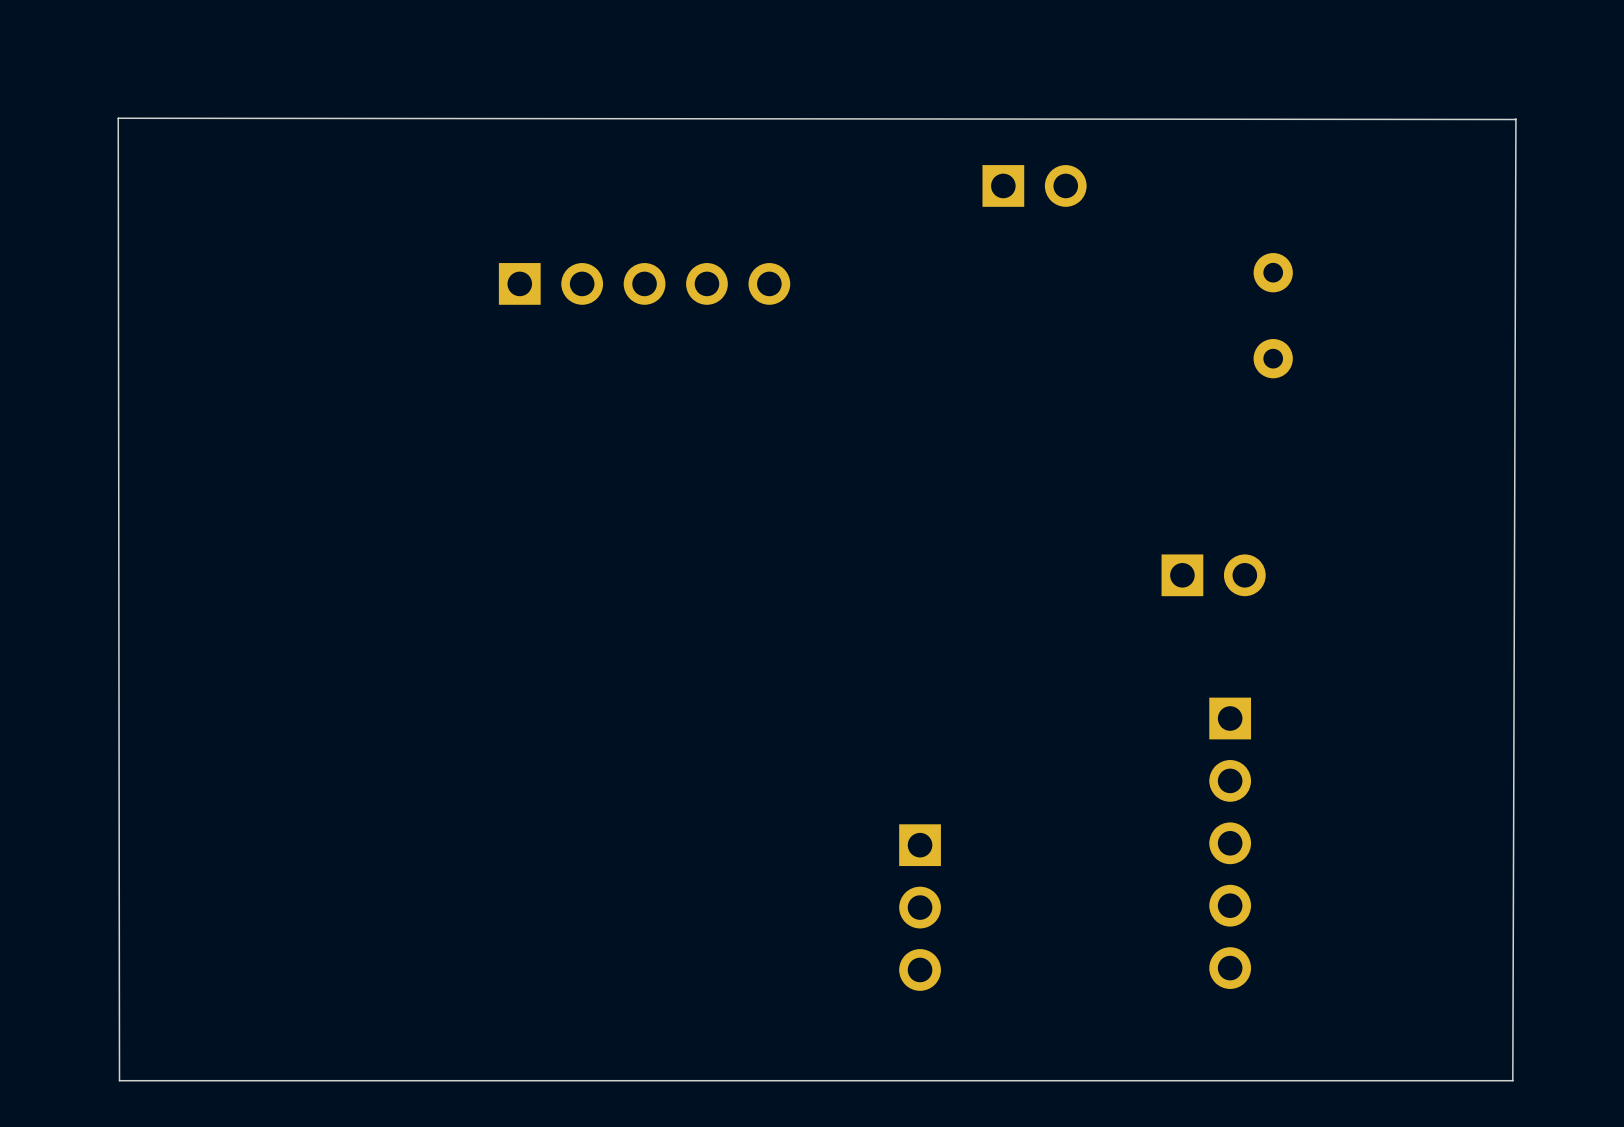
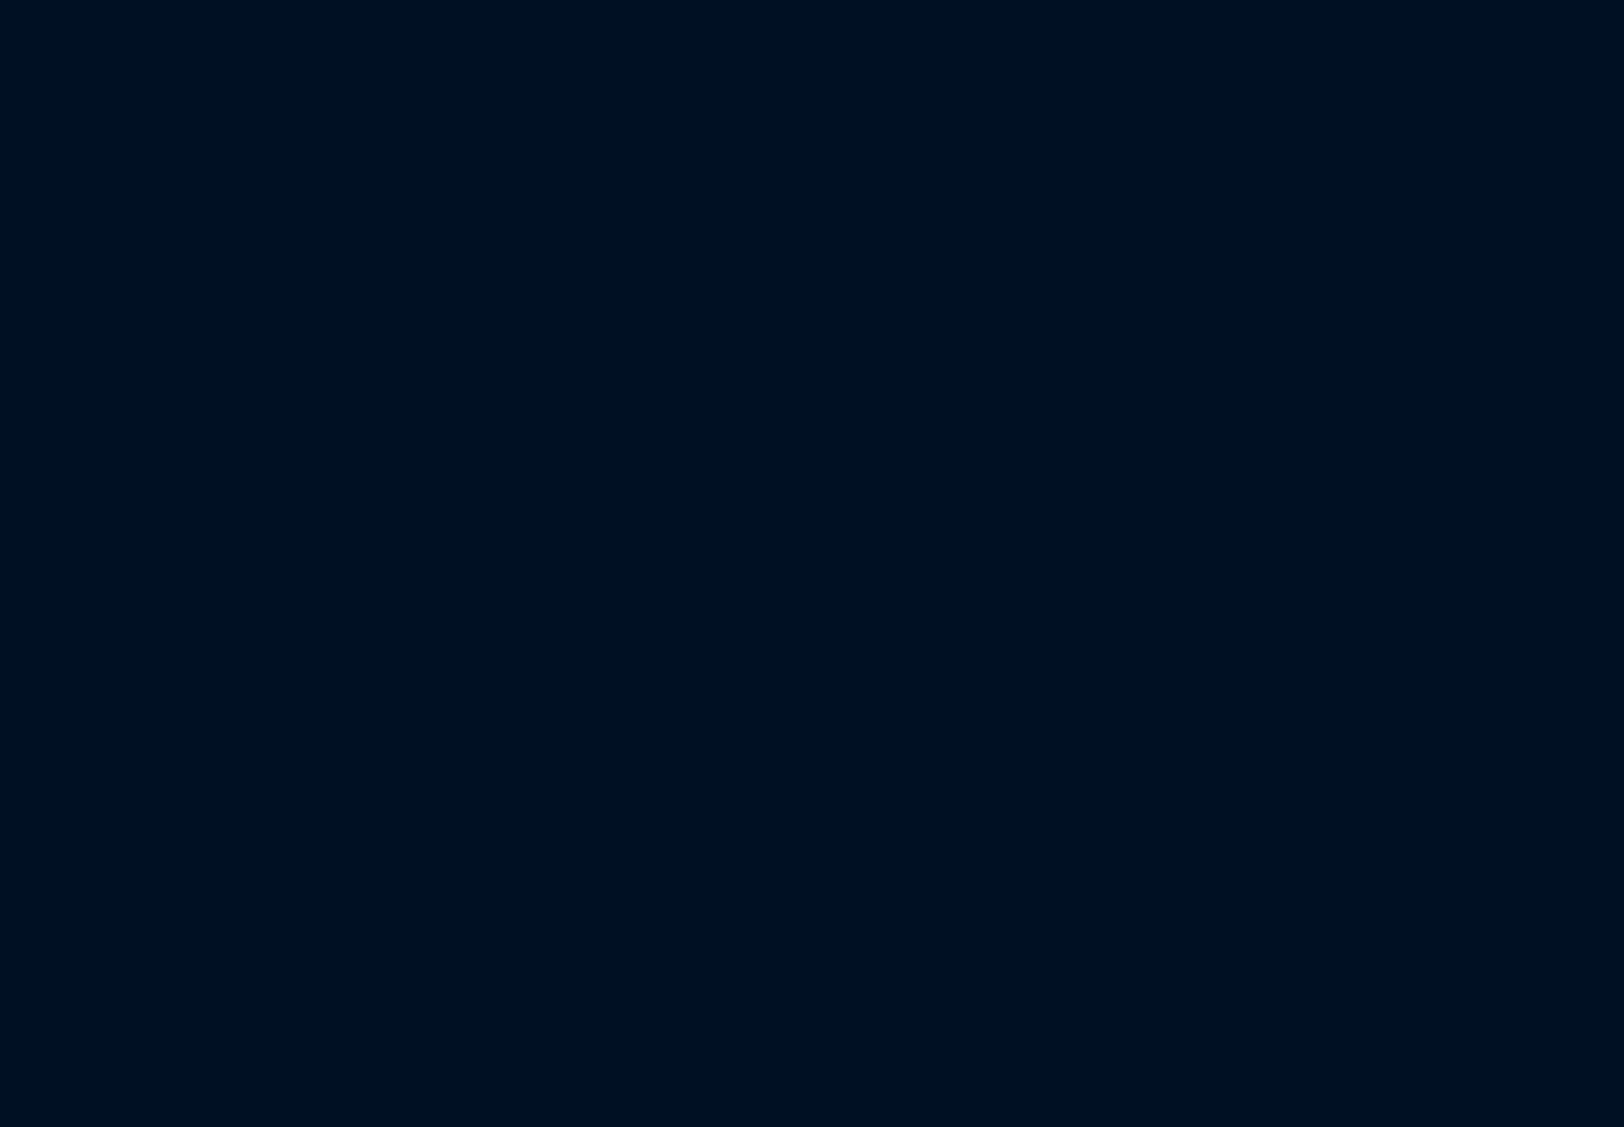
board edge: (118, 118) (119, 1080) (1512, 1080) (1515, 119) (118, 118) -> none
part: (1034, 185) -> none
part: (644, 283) -> none
part: (1273, 315) -> none
part: (1213, 575) -> none
part: (1230, 843) -> none
part: (920, 907) -> none

